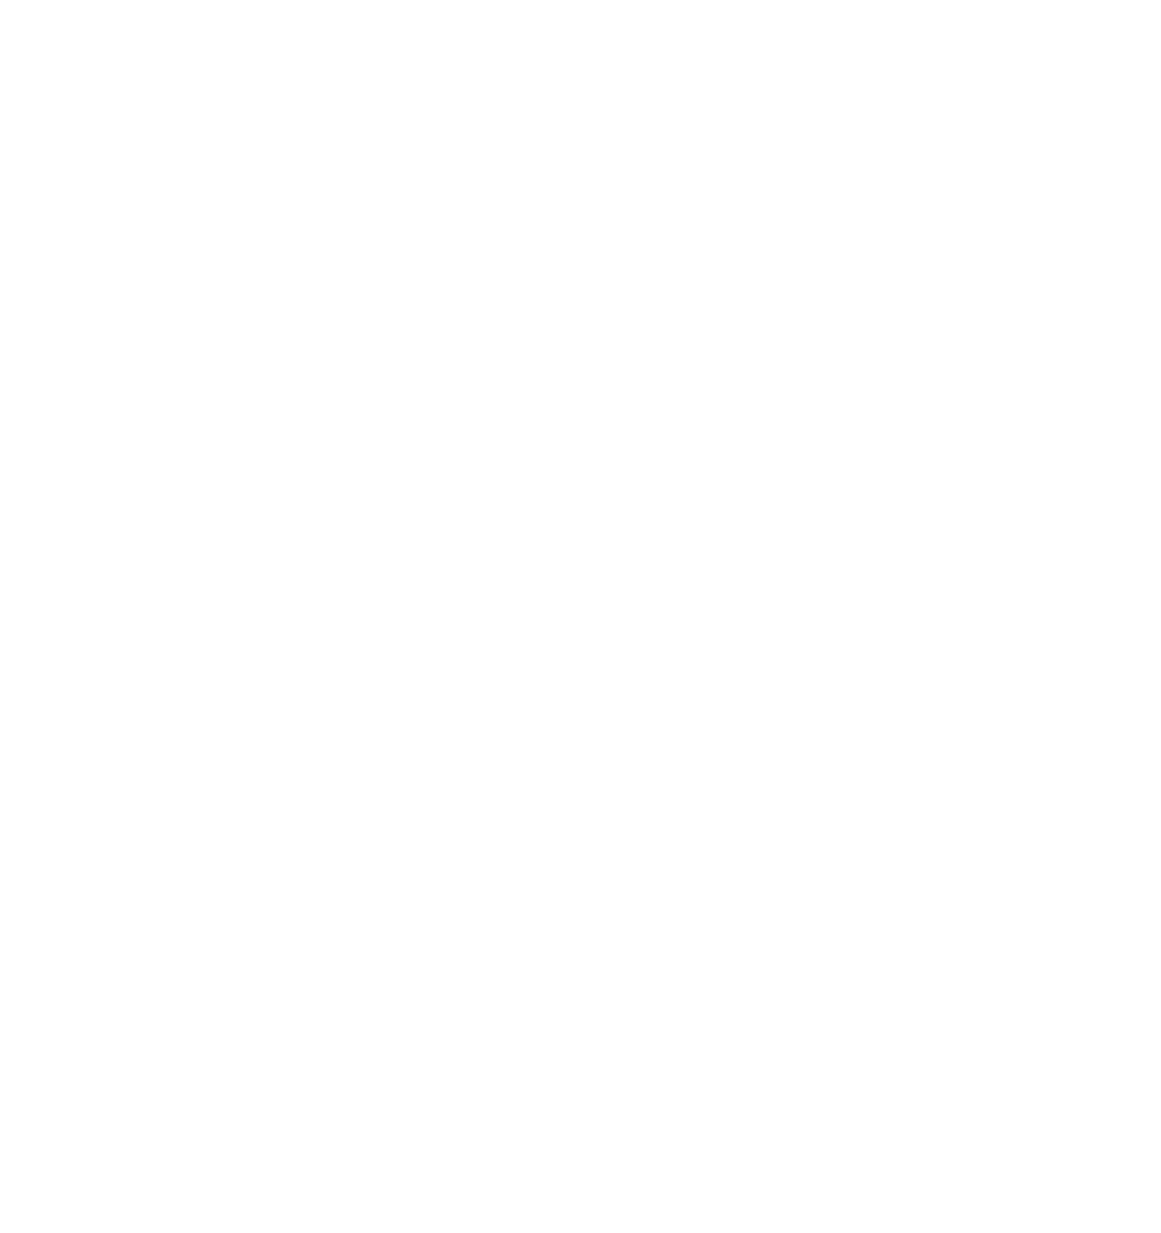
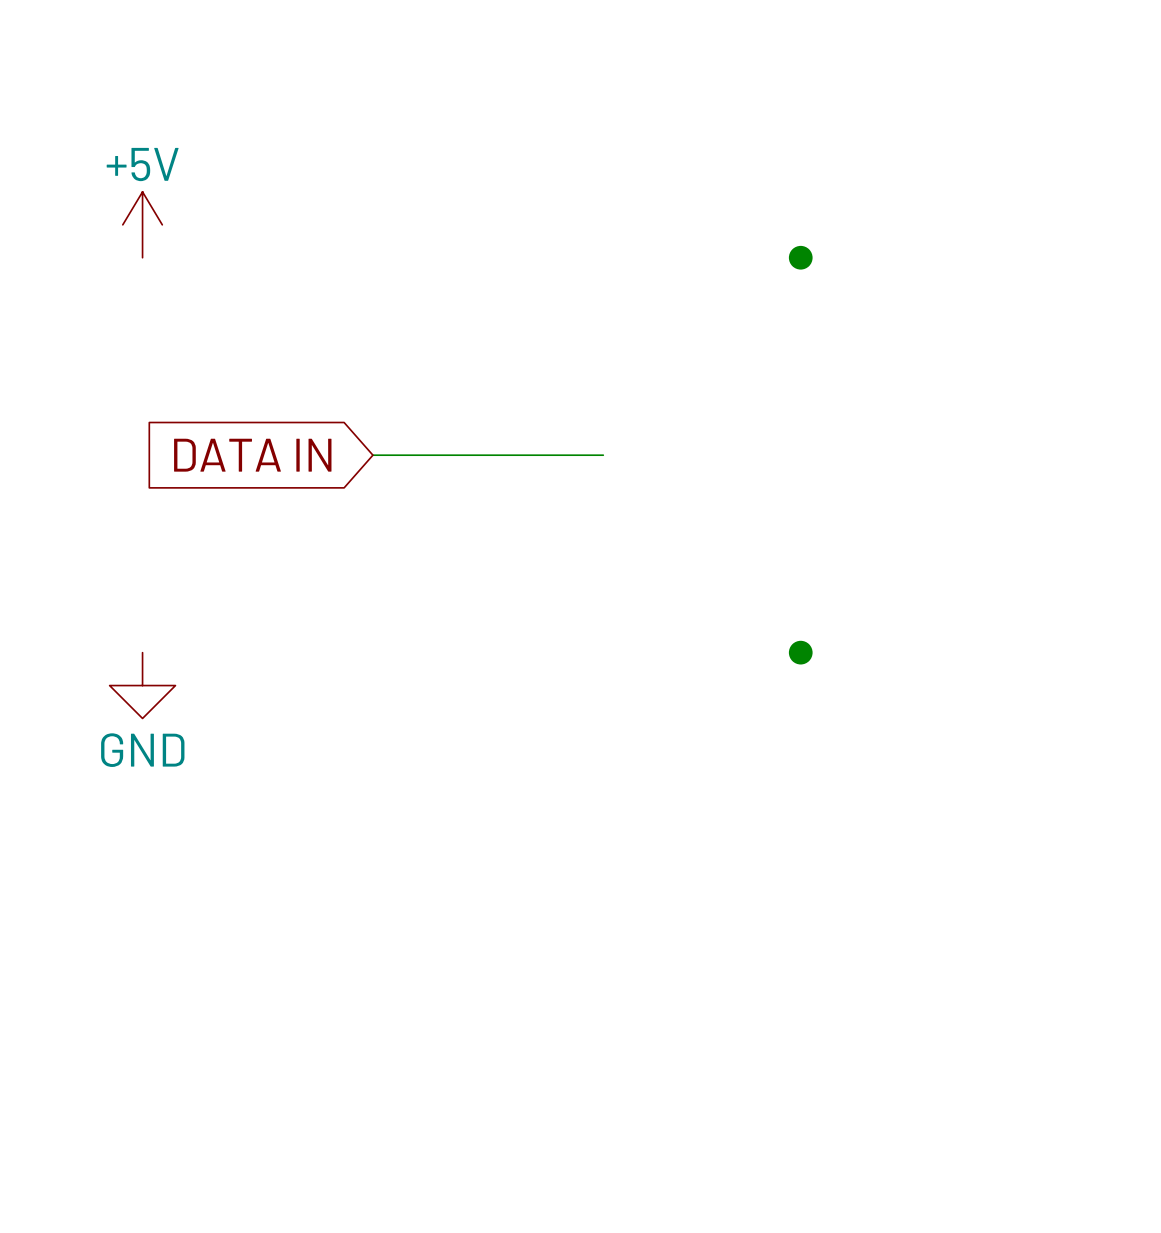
power symbol: none -> +5V (142, 224)
junction: none -> (800, 257)
global label: none -> DATA IN (252, 455)
wire: none -> (372, 455) (603, 455)
junction: none -> (800, 652)
power symbol: none -> GND (142, 685)

